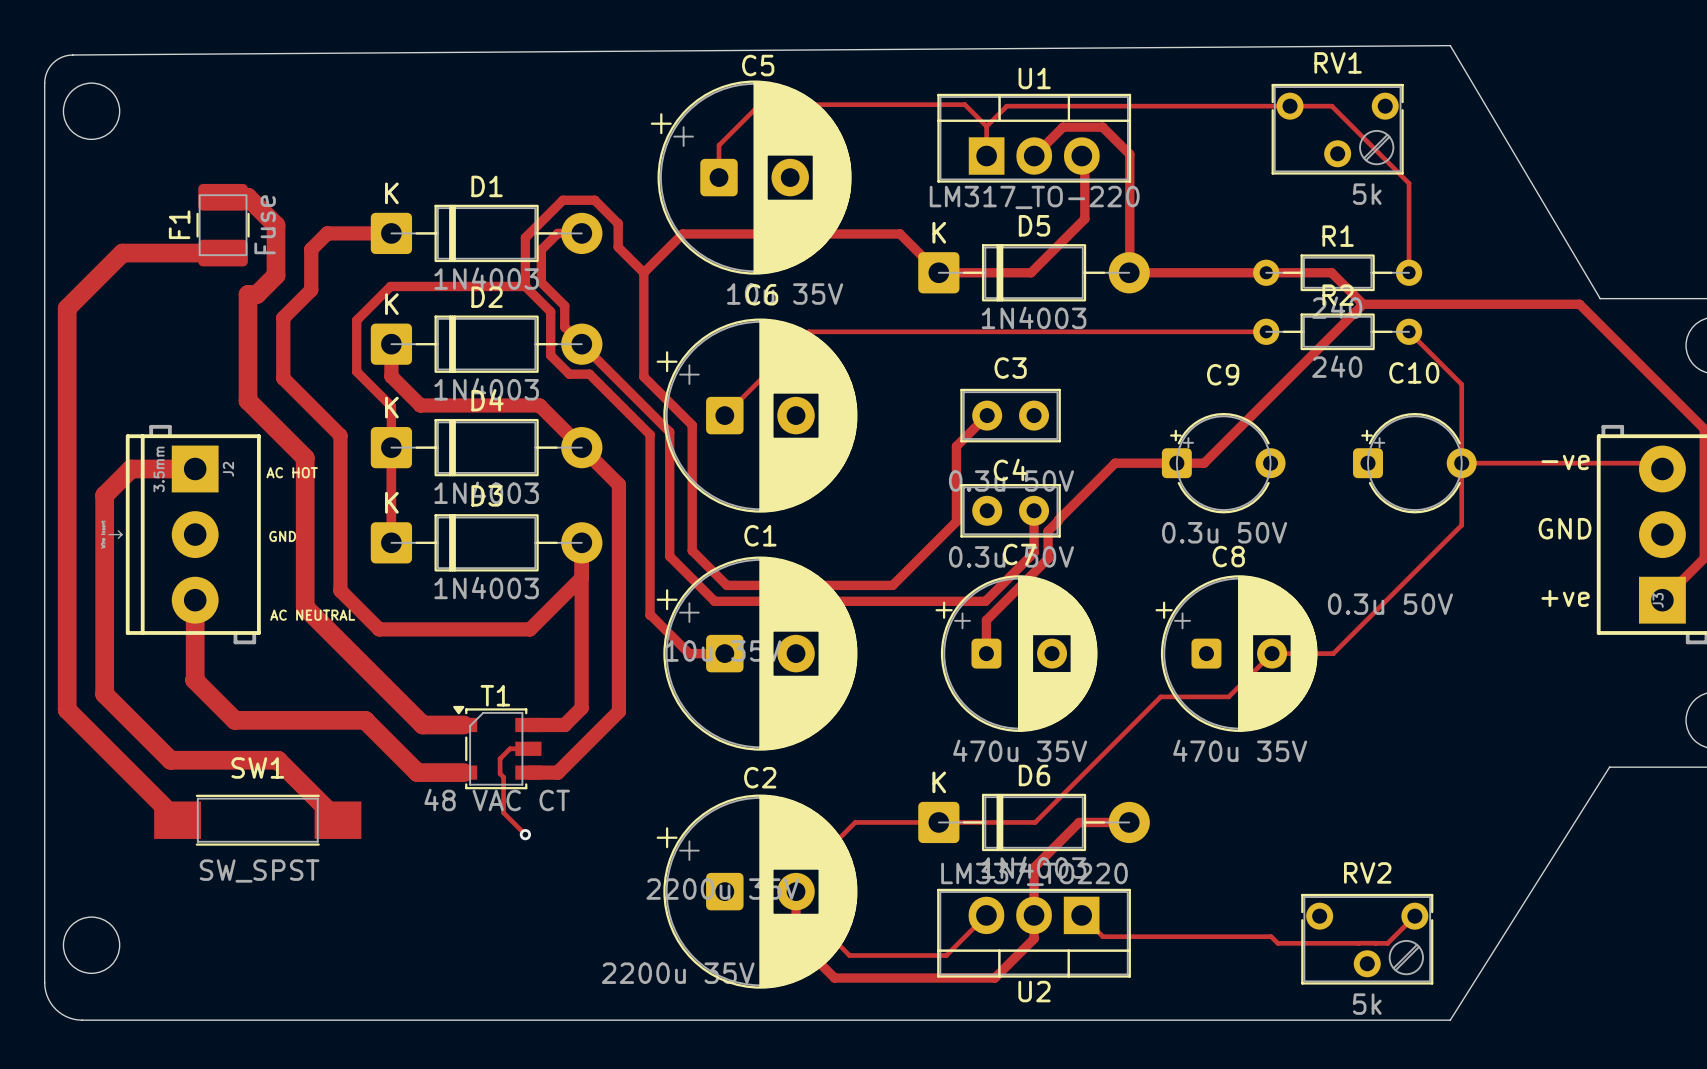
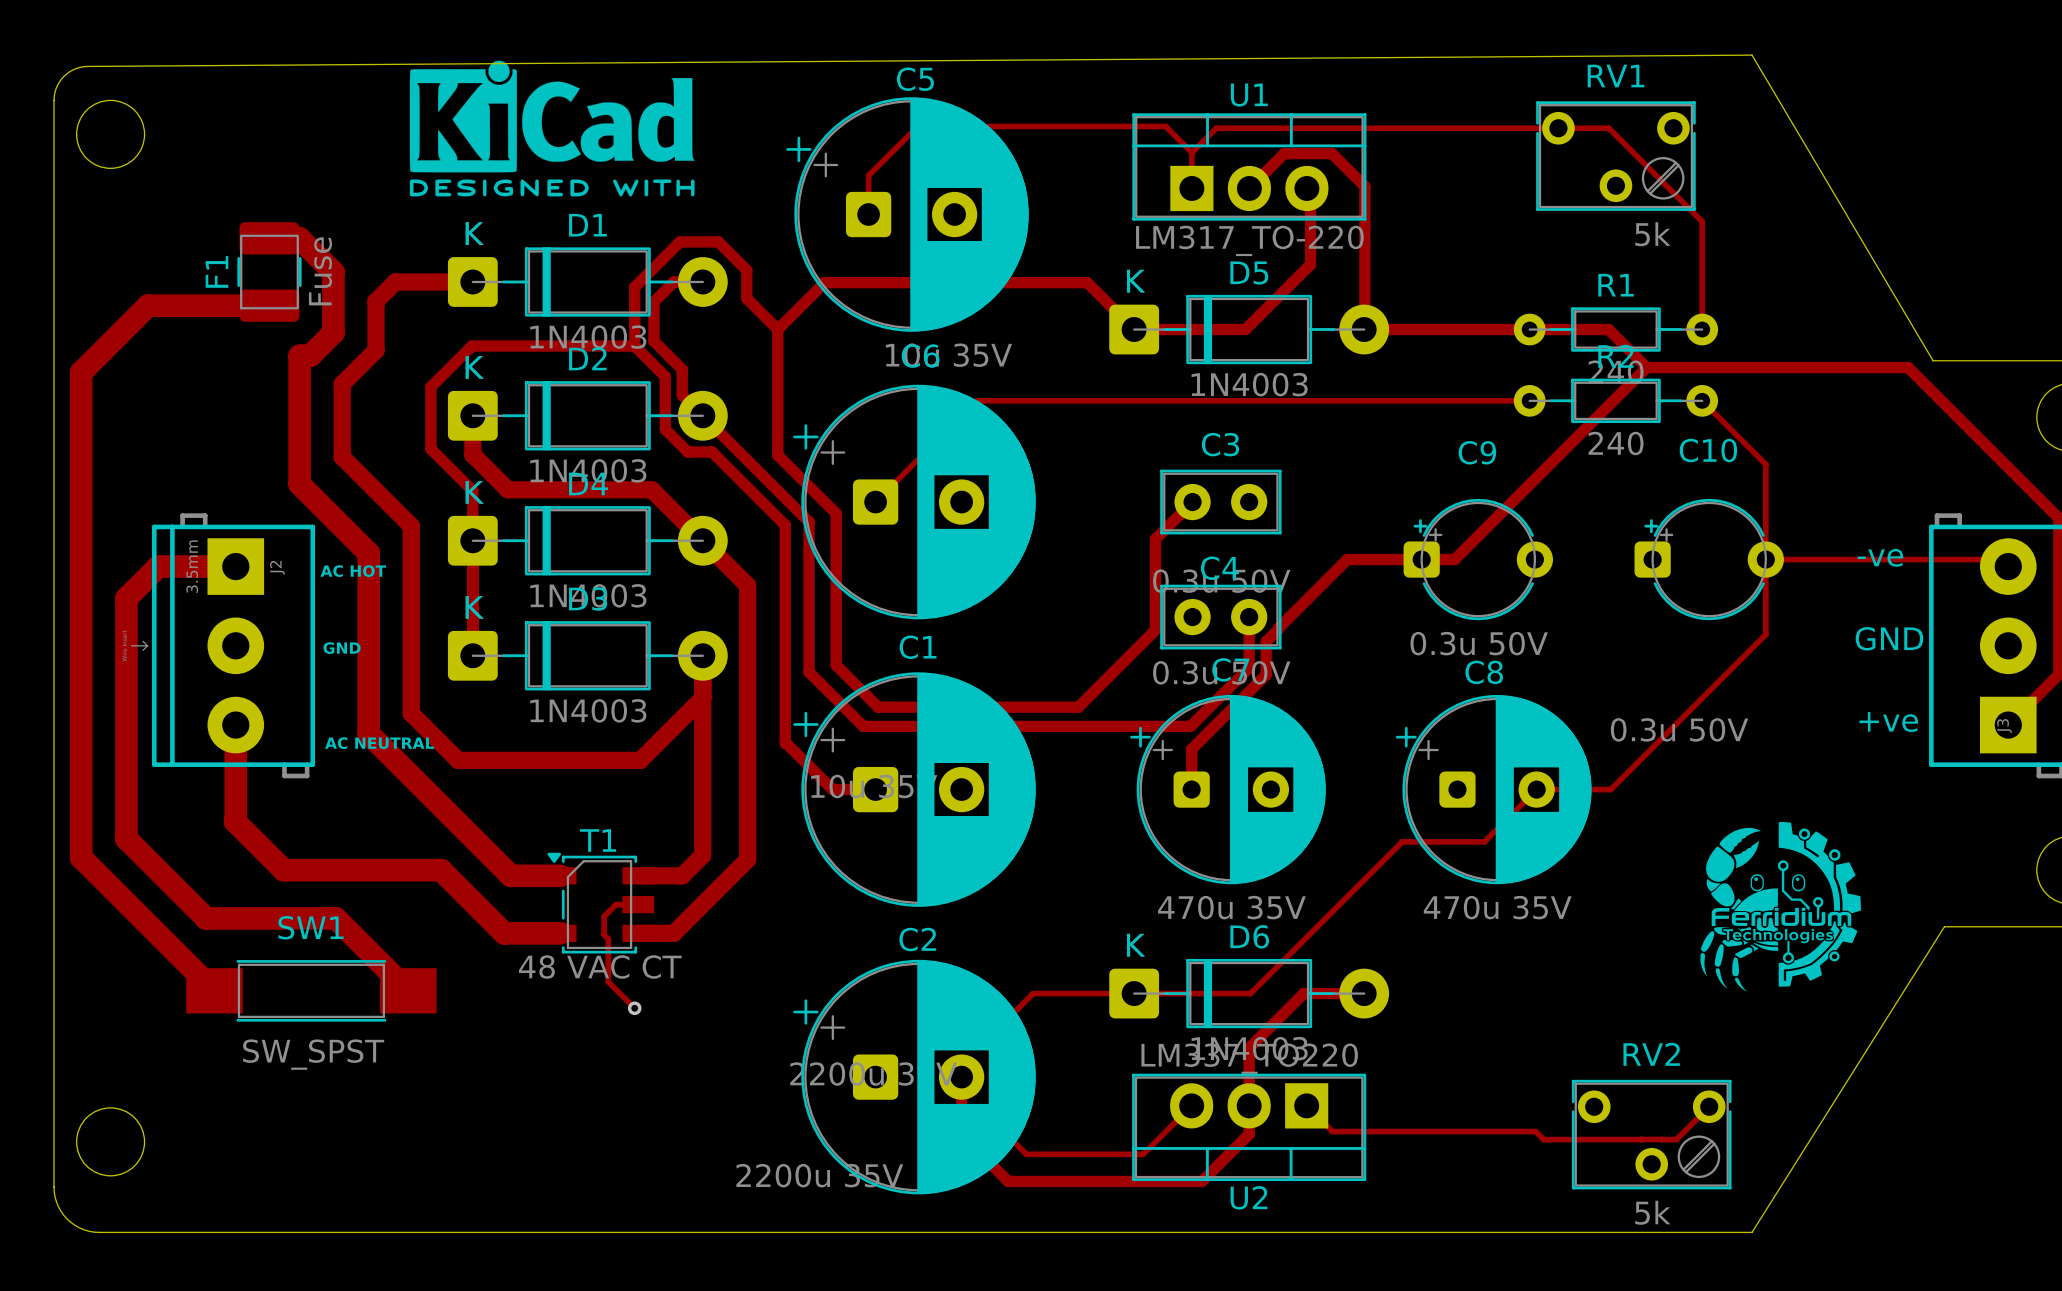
drawing: none -> [409, 60, 695, 197]
drawing: none -> [1699, 821, 1862, 992]

